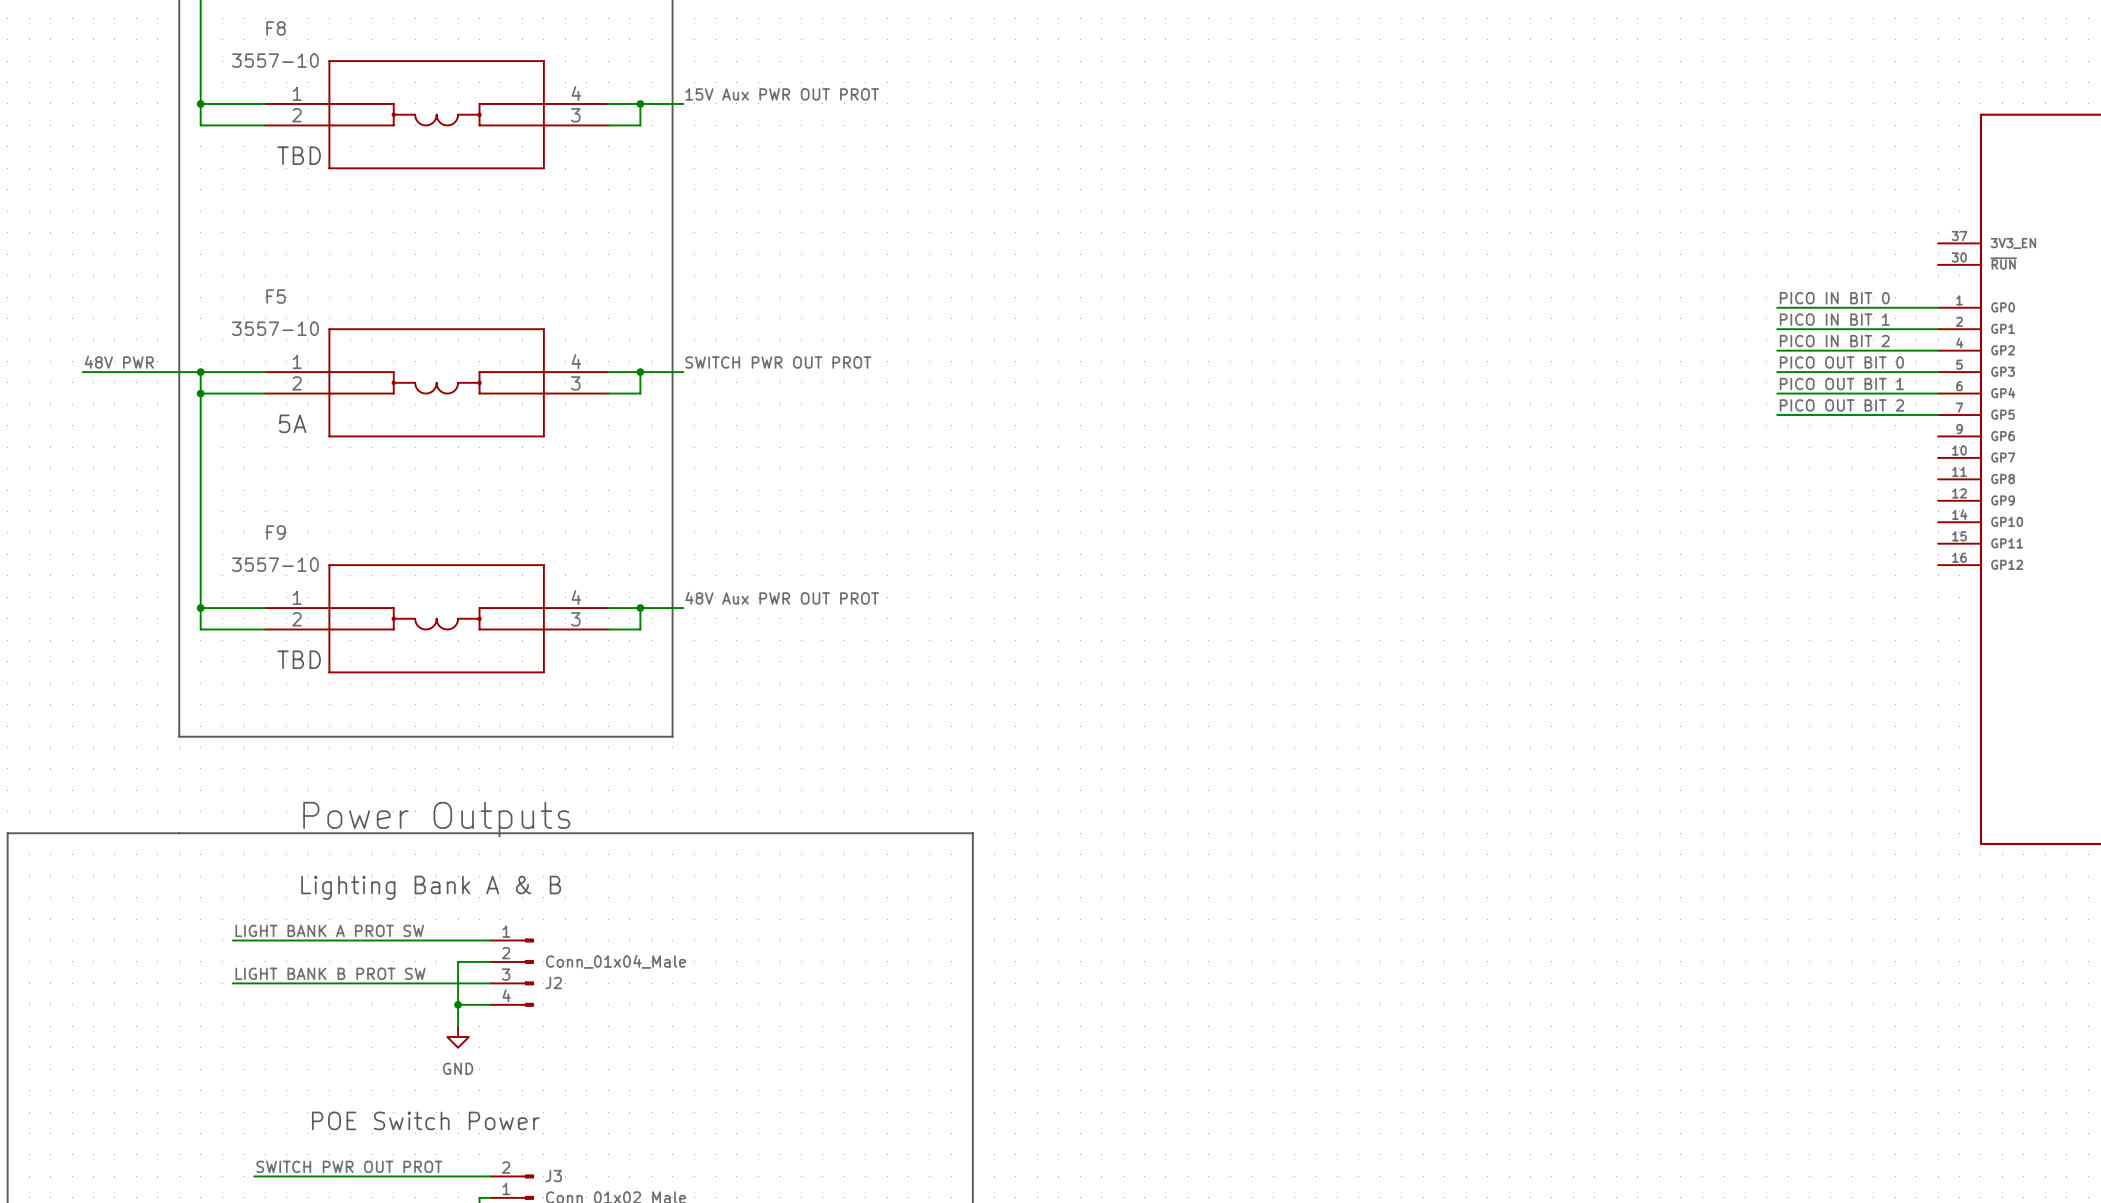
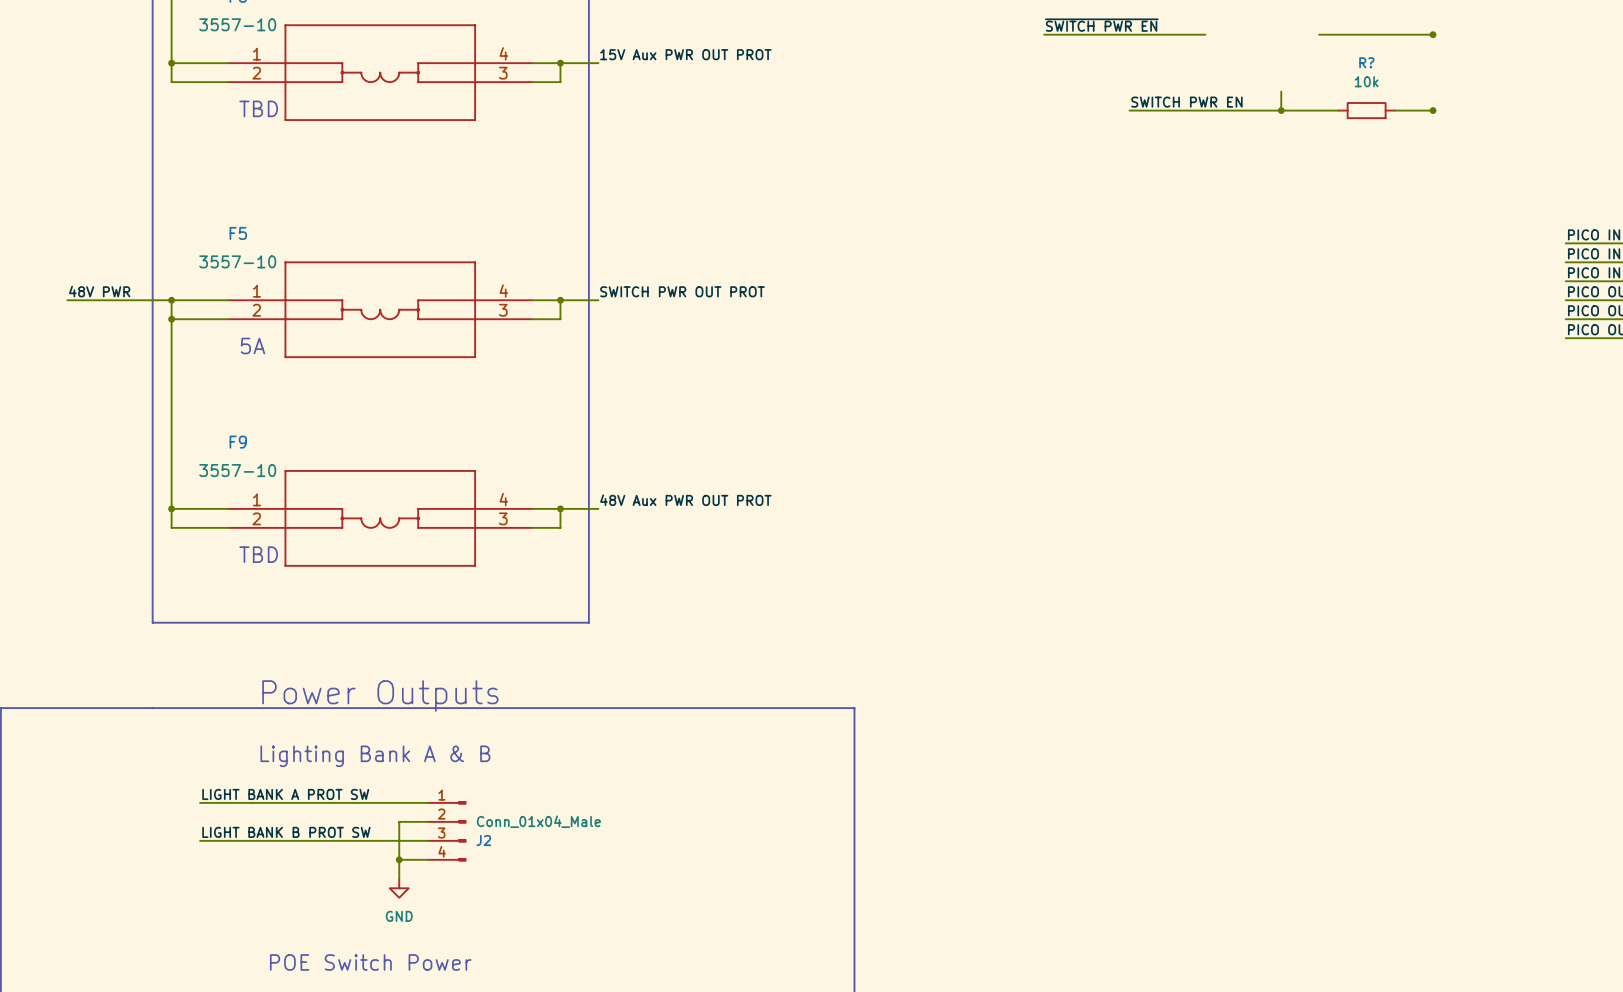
label: none -> ~{SWITCH PWR EN} (1101, 25)
wire: none -> (1044, 34) (1205, 34)
wire: none -> (1319, 34) (1433, 34)
junction: none -> (1433, 34)
wire: none -> (1281, 91) (1281, 110)
label: none -> SWITCH PWR EN (1186, 102)
wire: none -> (1129, 110) (1338, 110)
junction: none -> (1281, 110)
R?: none -> 10k (1366, 110)
wire: none -> (1395, 110) (1433, 110)
junction: none -> (1433, 110)

